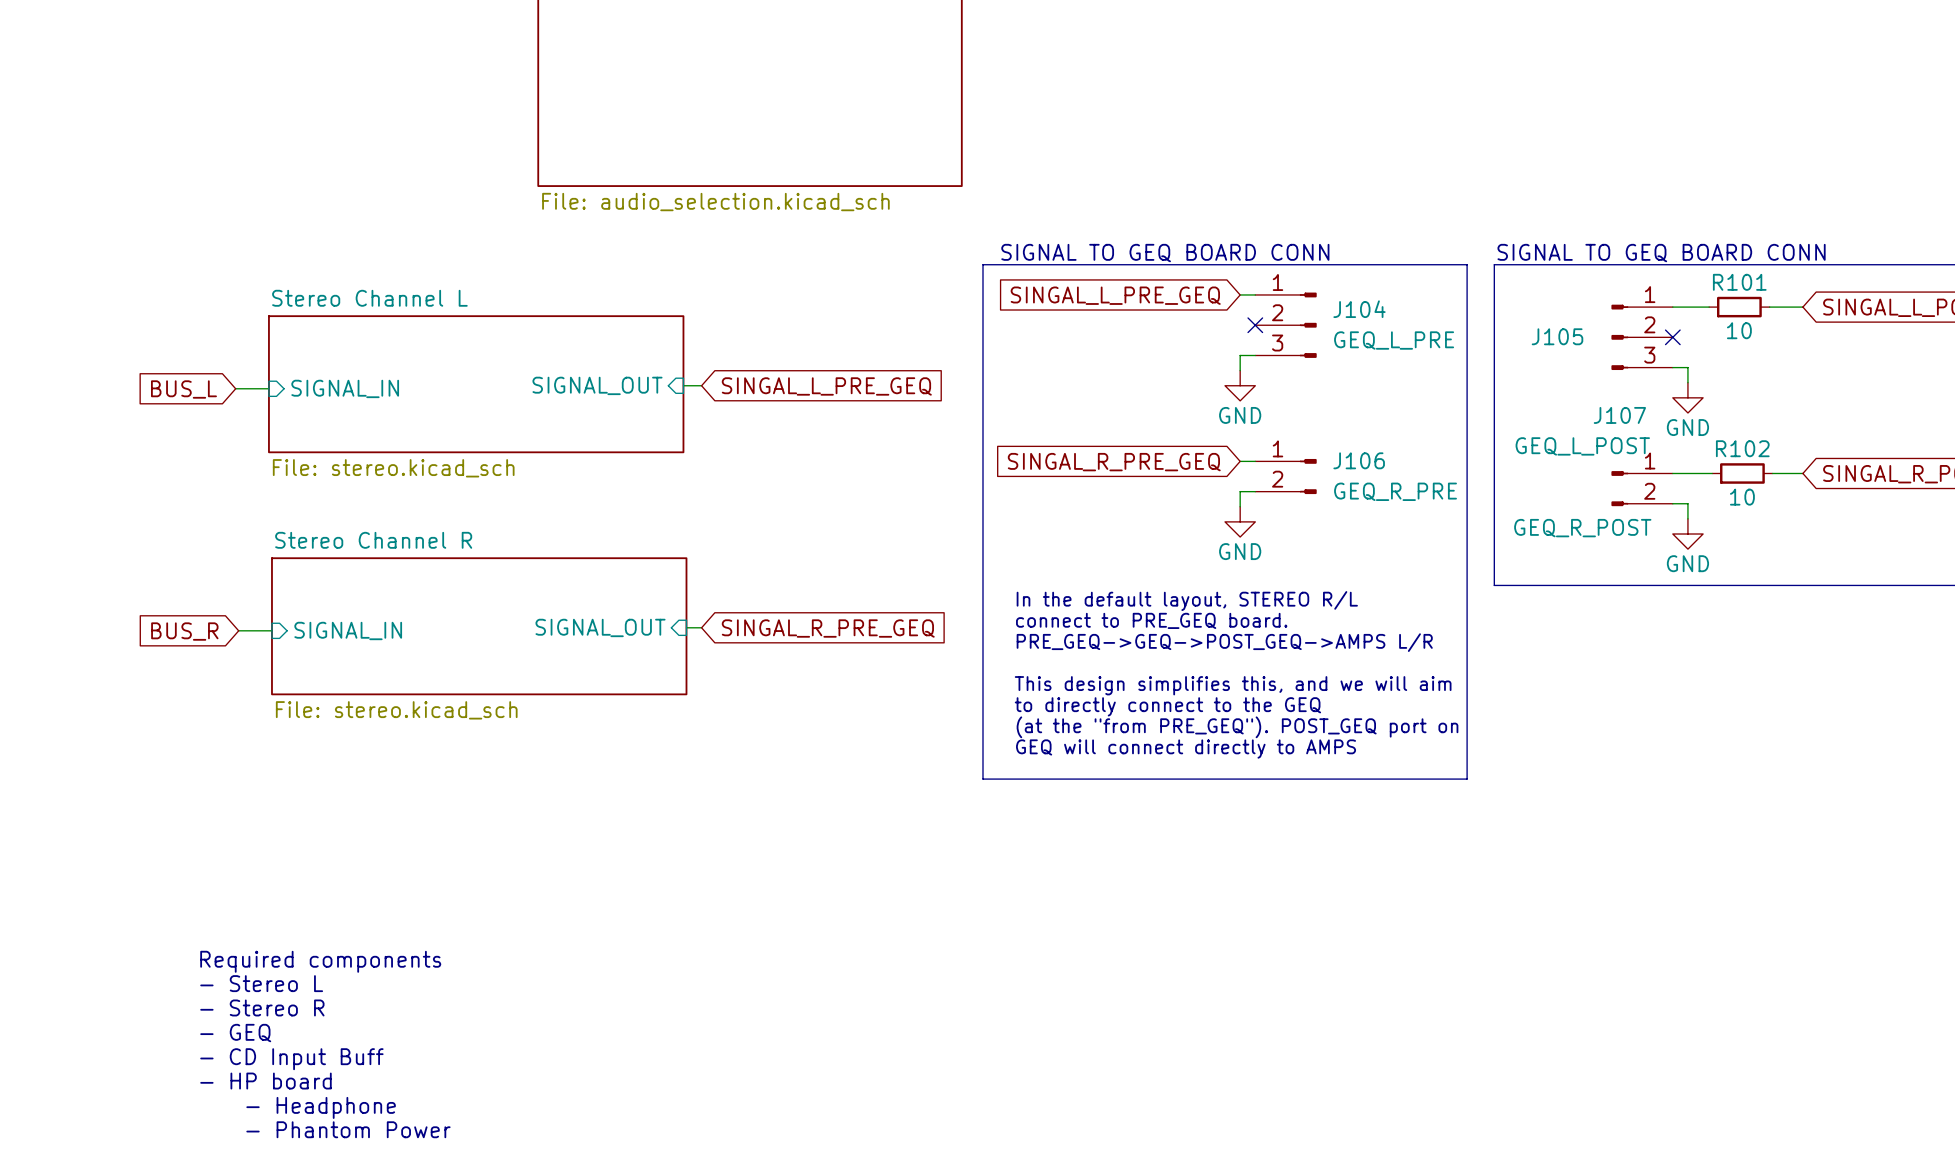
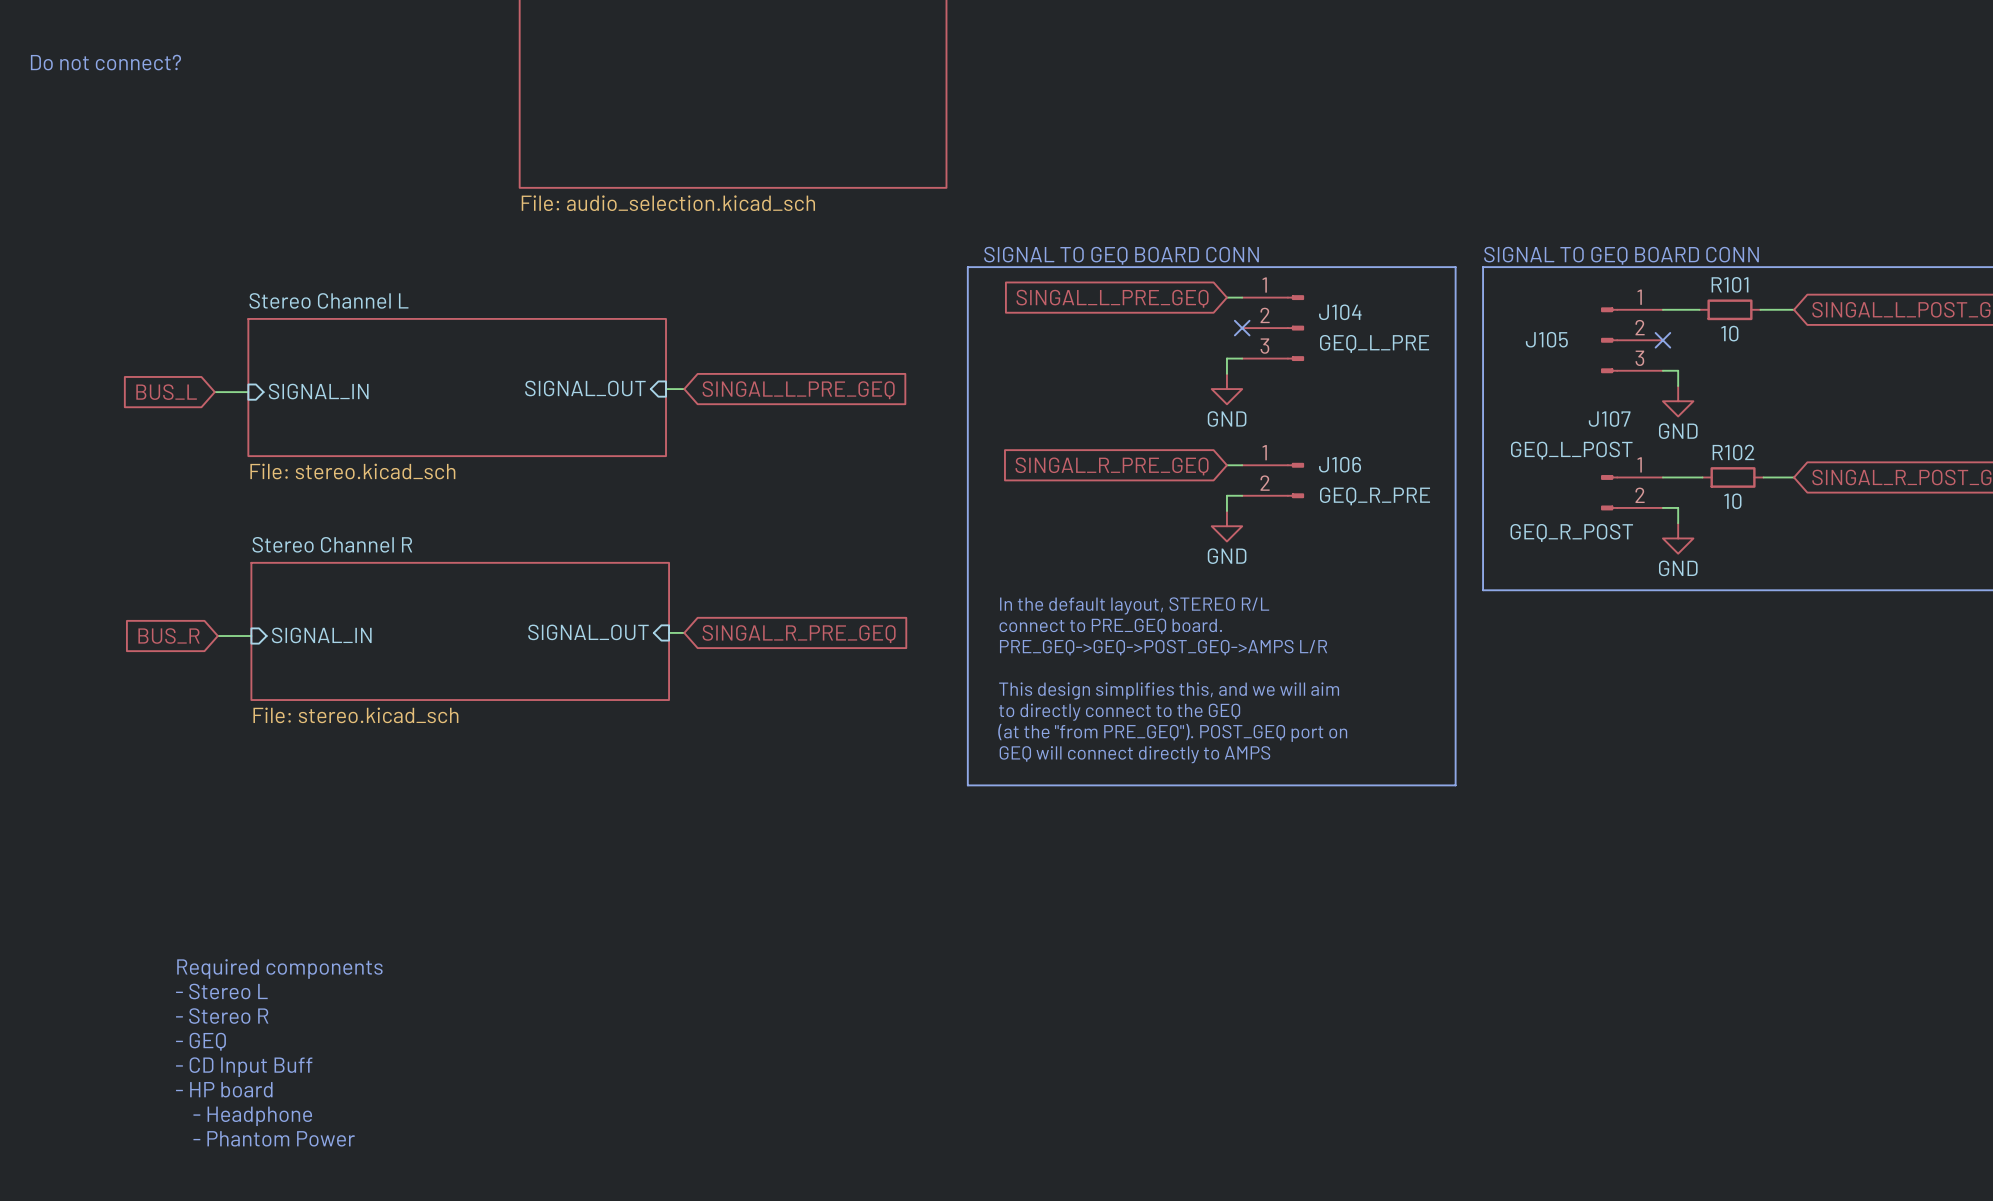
text: none -> Do not connect? (105, 62)

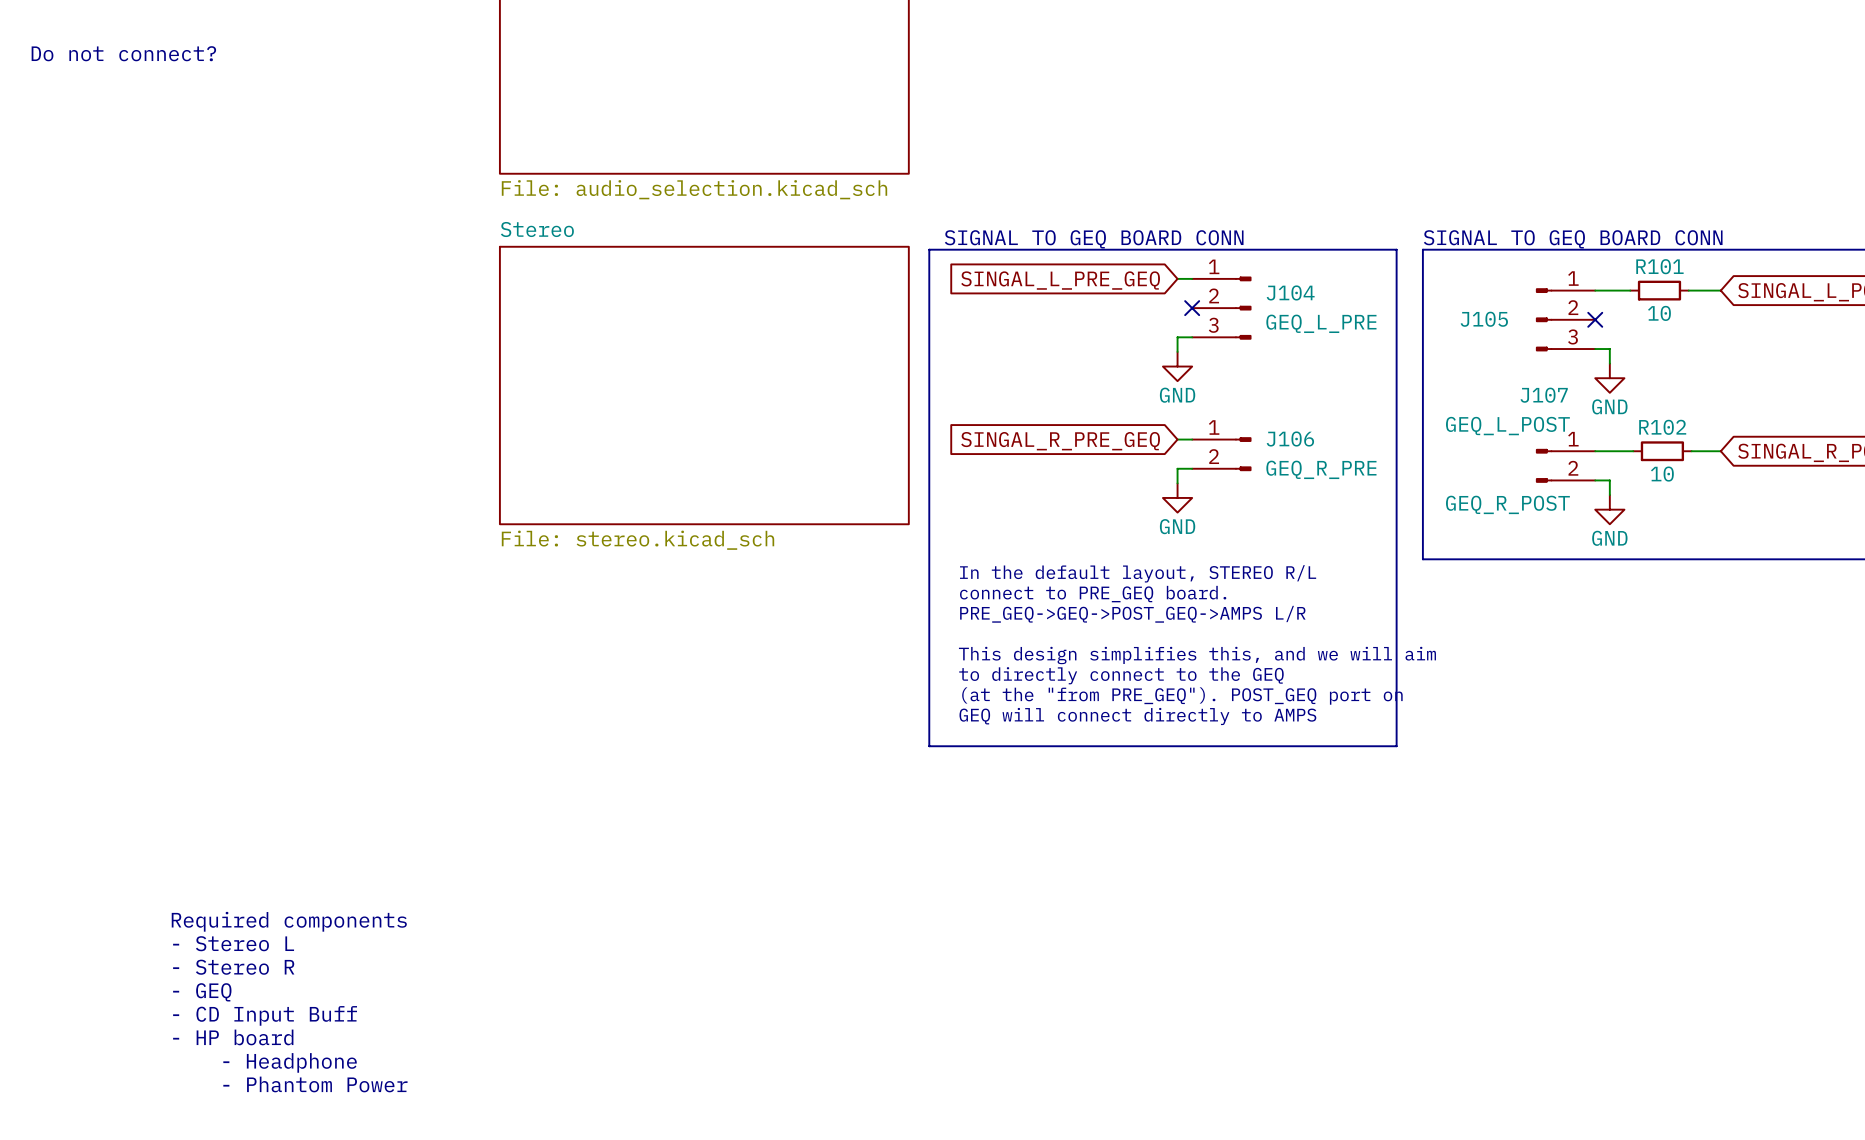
sheet Stereo Channel L: File: stereo.kicad_sch (457, 387) -> none
sheet pin: SIGNAL_OUT (585, 388) -> none
wire: (666, 389) (684, 389) -> none
global label: SINGAL_L_PRE_GEQ (798, 390) -> none
sheet pin: SIGNAL_IN (318, 391) -> none
global label: BUS_L (166, 392) -> none
wire: (214, 392) (248, 392) -> none
sheet Stereo: none -> File: stereo.kicad_sch (704, 385)
sheet Stereo Channel R: File: stereo.kicad_sch (460, 631) -> none
sheet pin: SIGNAL_OUT (588, 632) -> none
wire: (669, 632) (684, 632) -> none
global label: SINGAL_R_PRE_GEQ (799, 634) -> none
sheet pin: SIGNAL_IN (321, 635) -> none
global label: BUS_R (169, 636) -> none
wire: (217, 636) (251, 636) -> none

